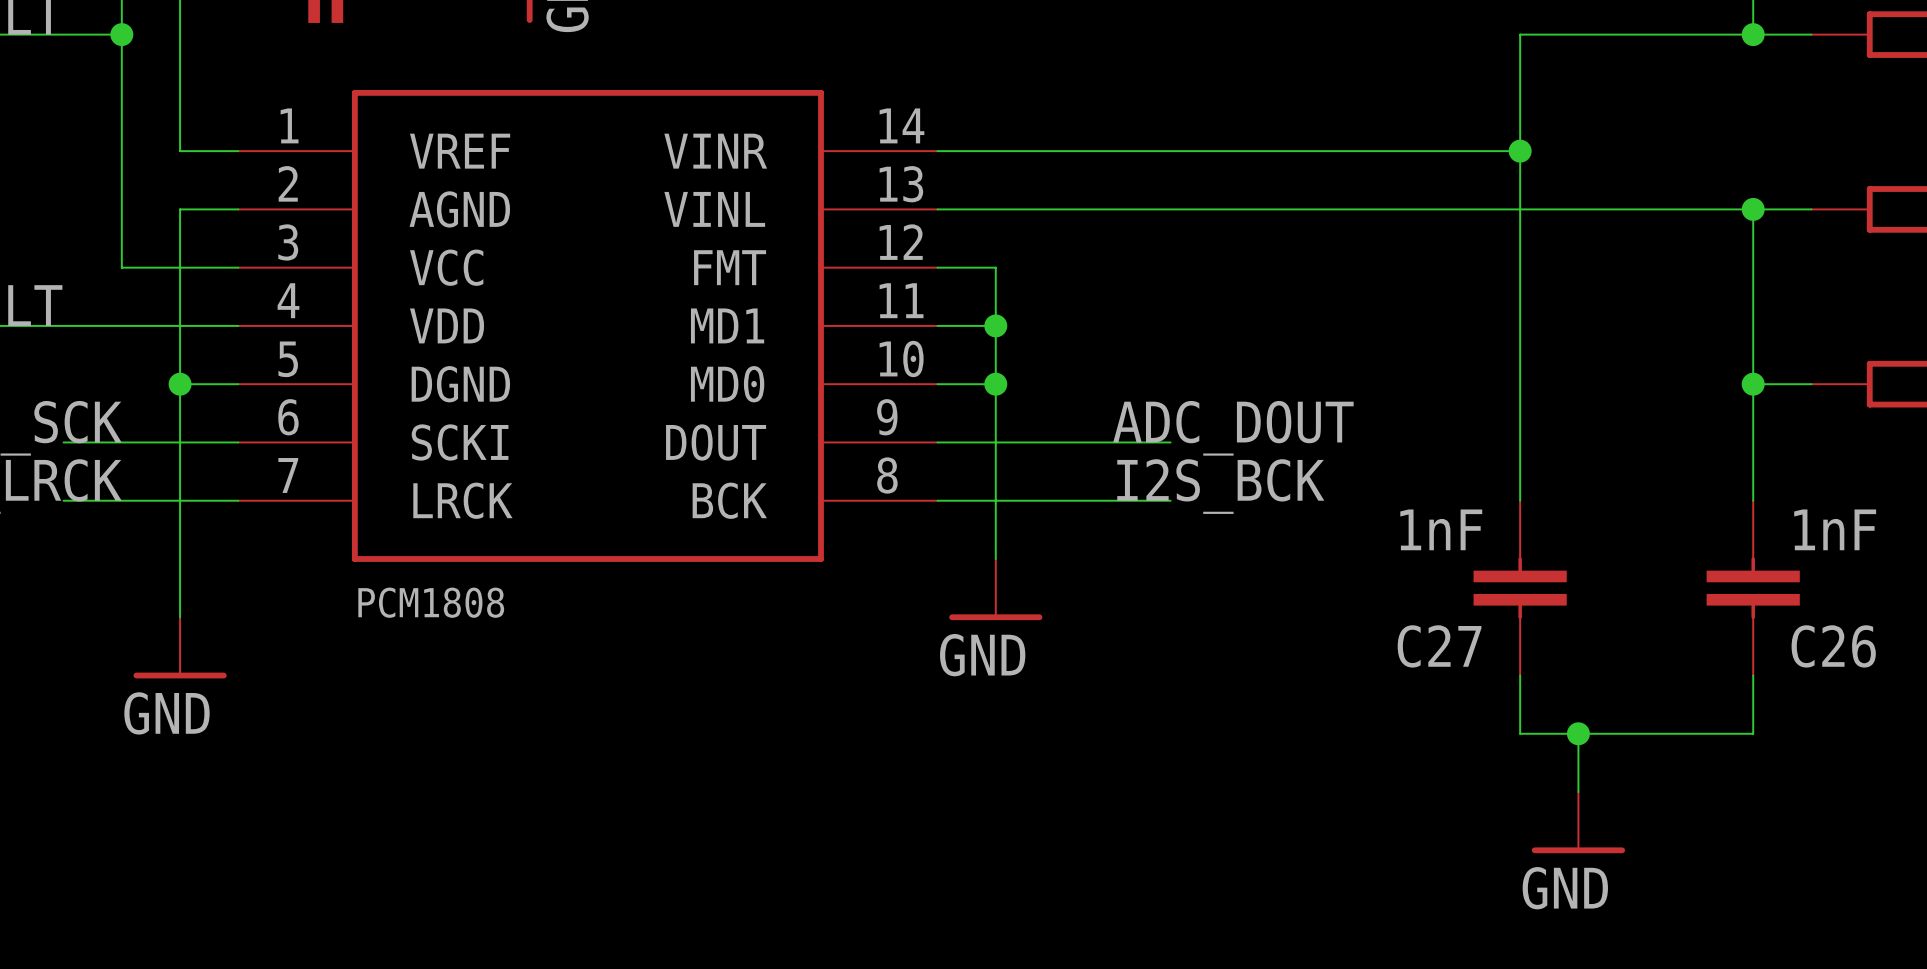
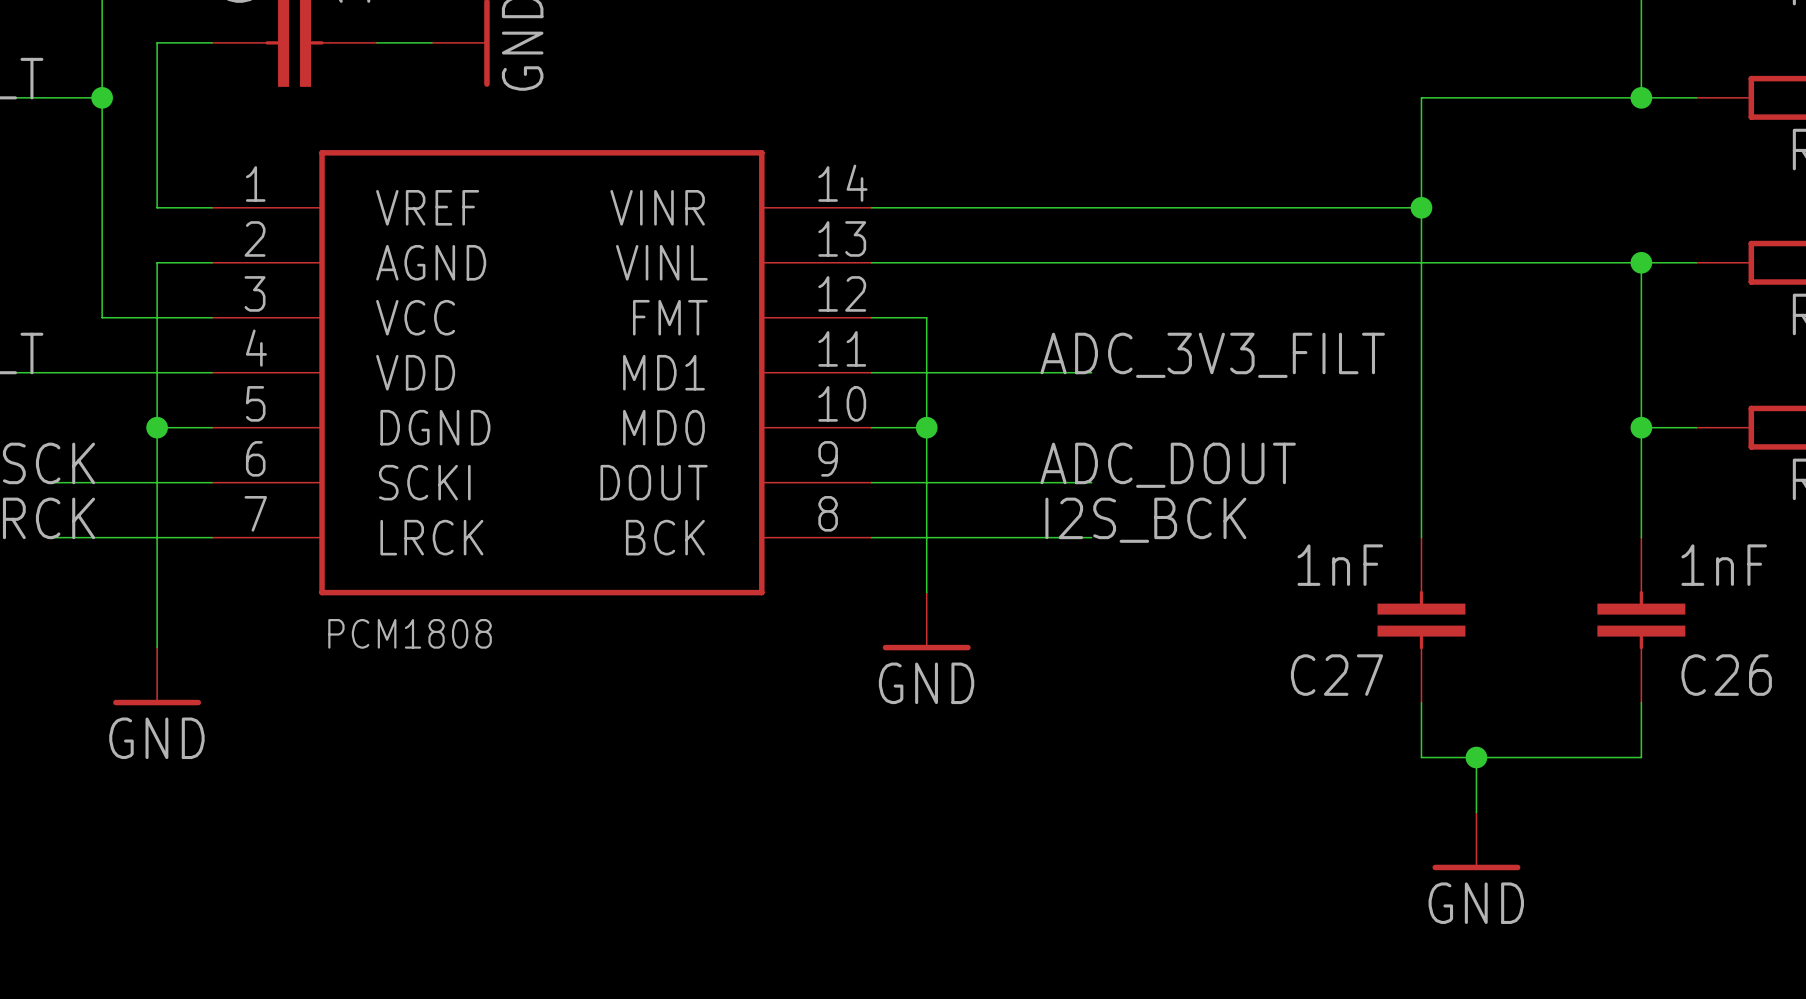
label: none -> ADC_3V3_FILT (1212, 355)
wire: none -> (926, 372) (1091, 372)
junction: (995, 325) -> none

